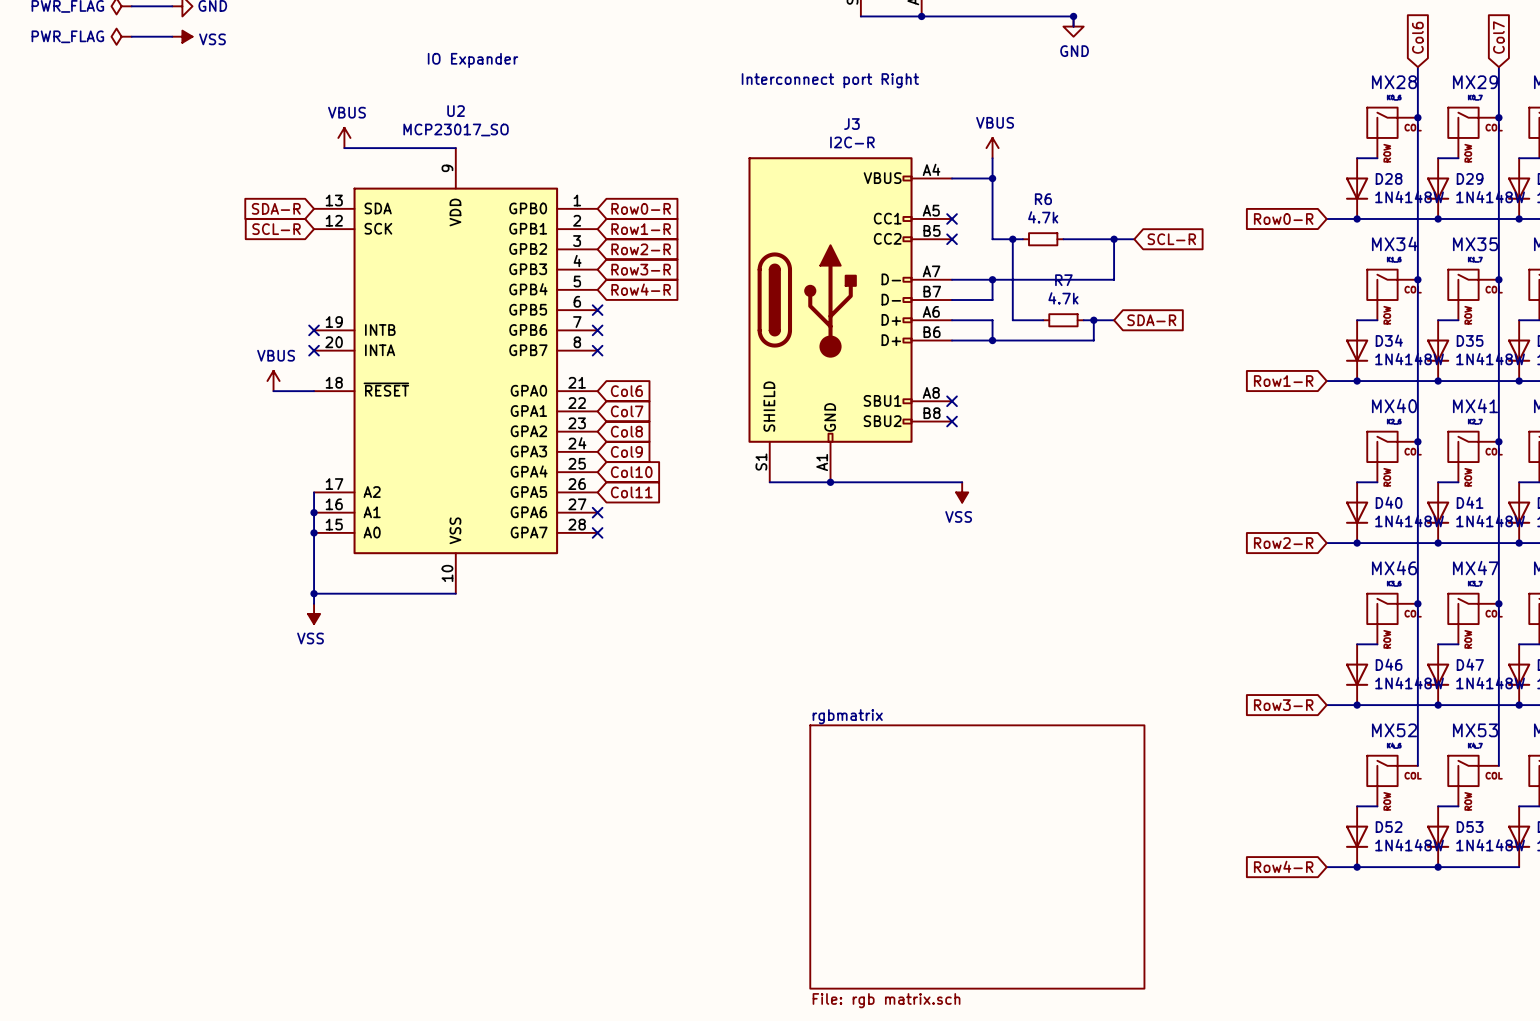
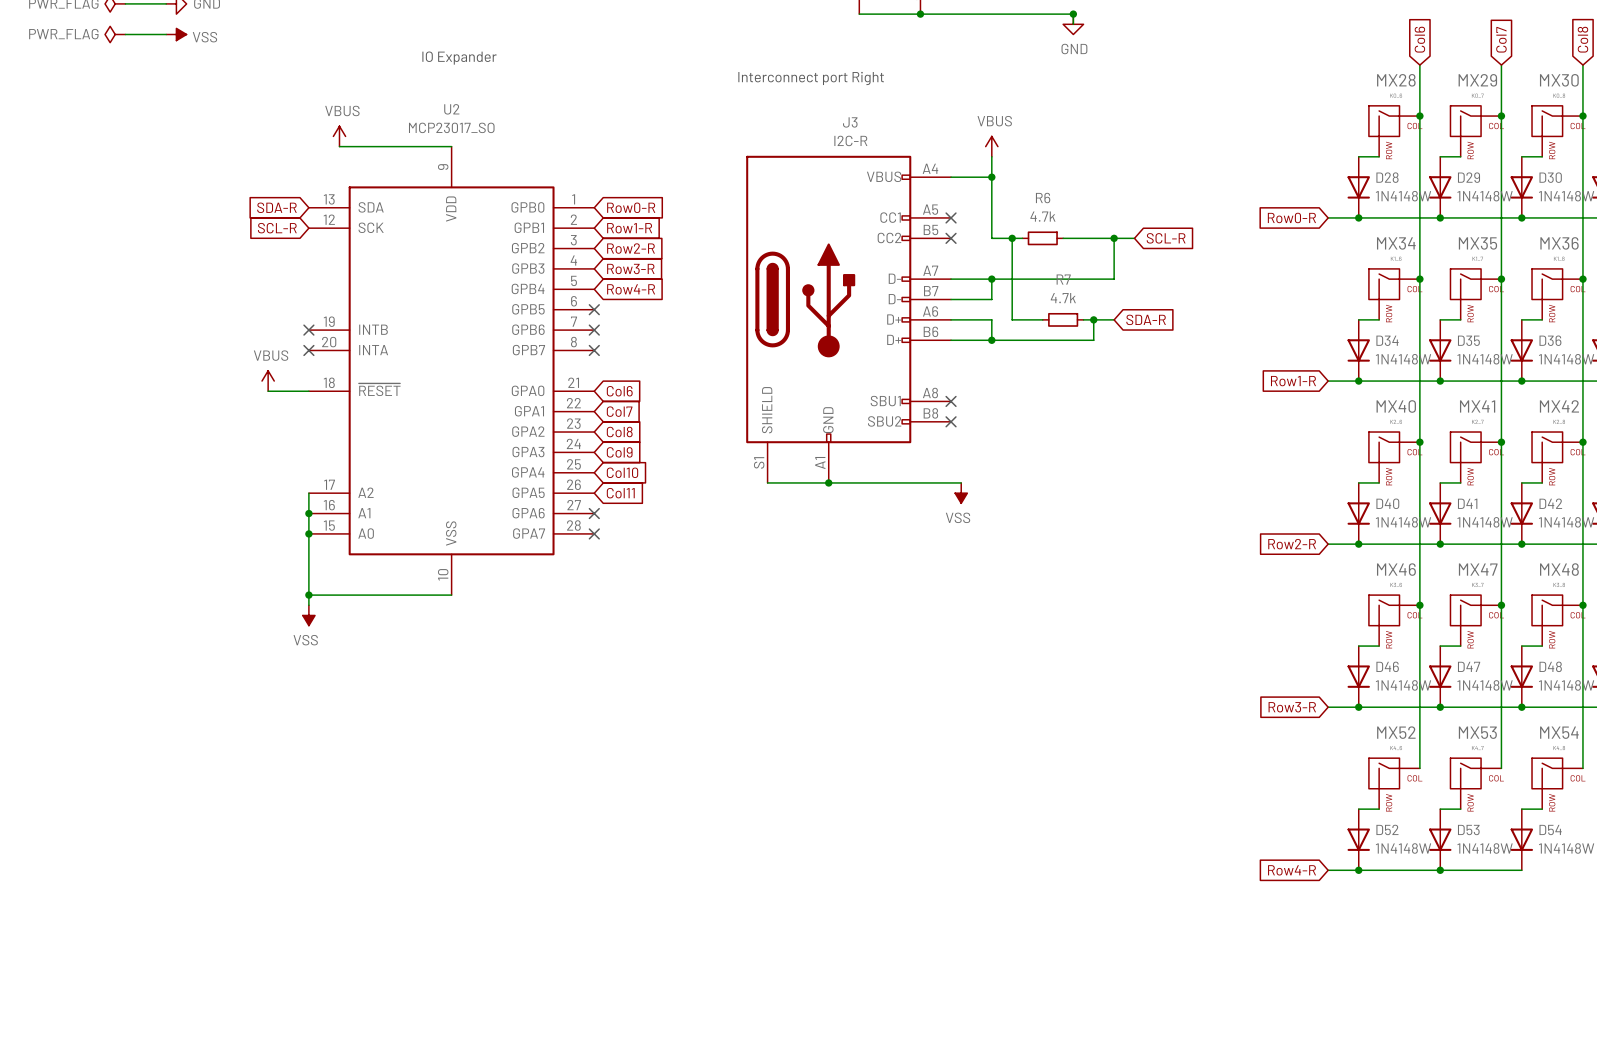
sheet rgbmatrix: File: rgb matrix.sch (977, 856) -> none

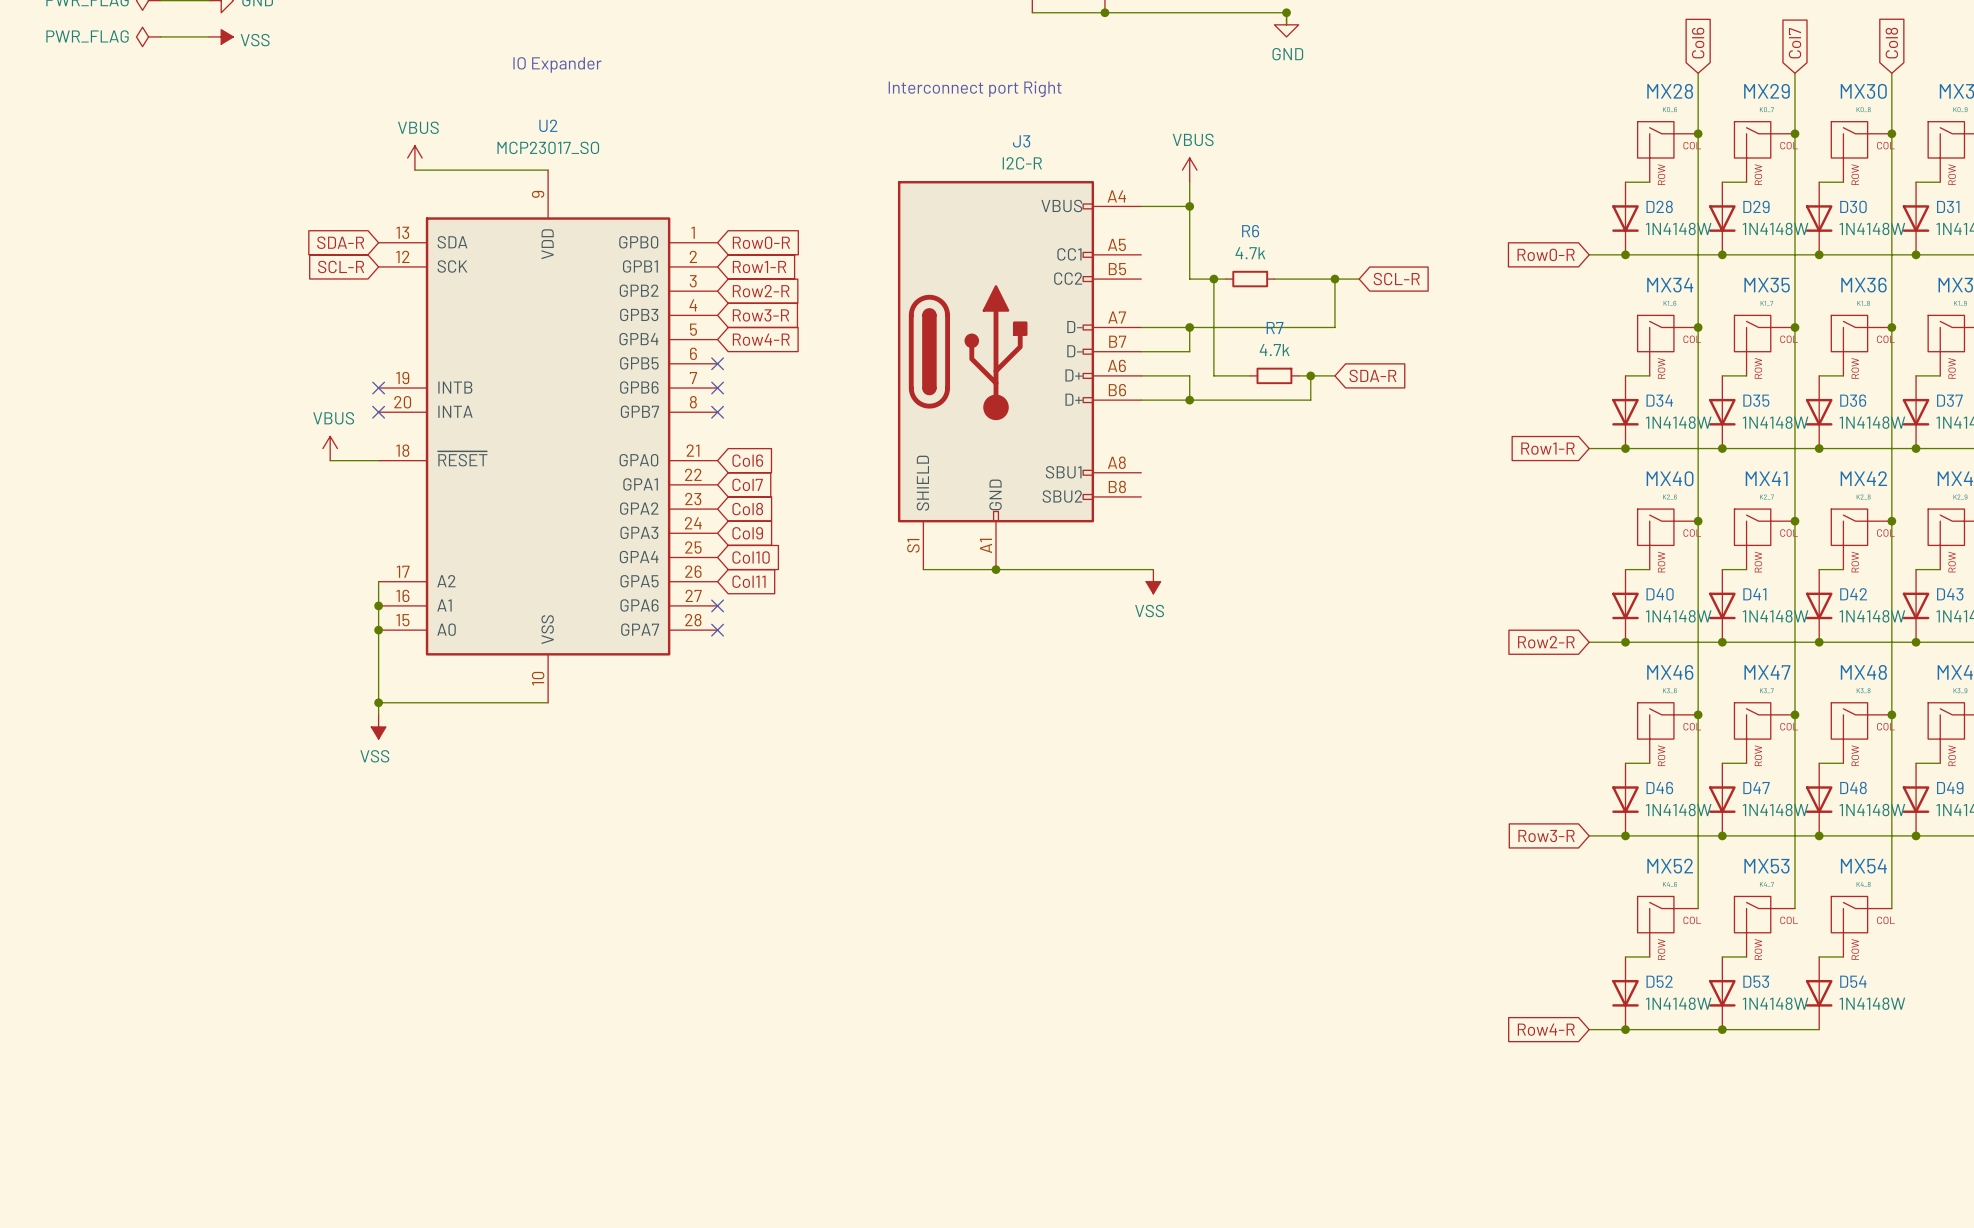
no-connect mark: (951, 217) -> none
no-connect mark: (951, 238) -> none
no-connect mark: (951, 401) -> none
no-connect mark: (951, 421) -> none

